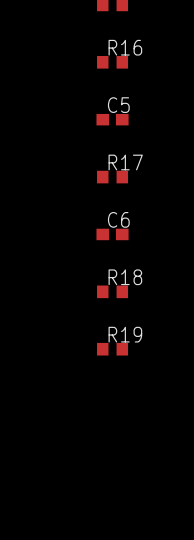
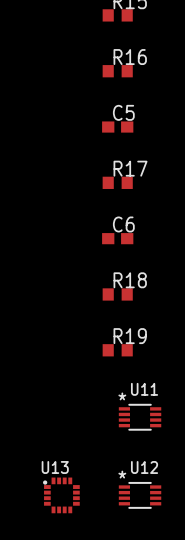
U11: none -> (140, 417)
U13: none -> (61, 495)
U12: none -> (140, 495)

